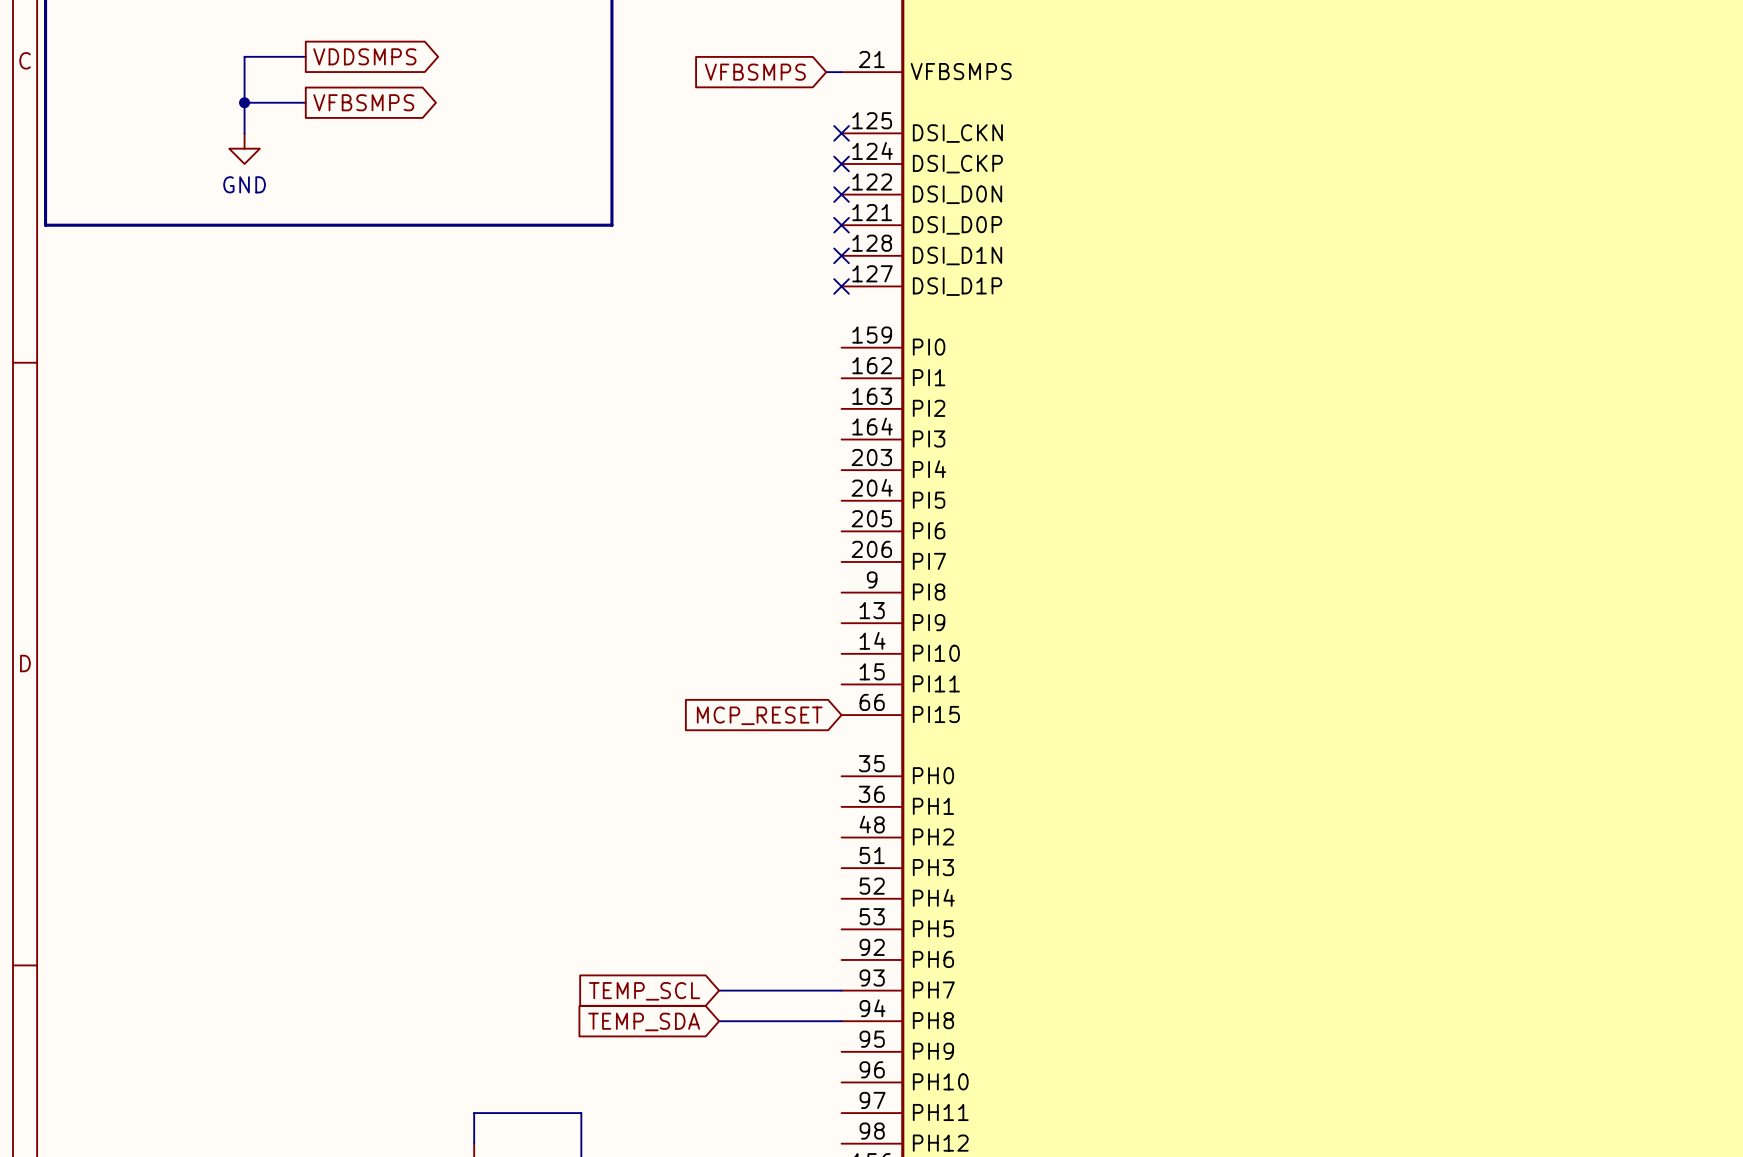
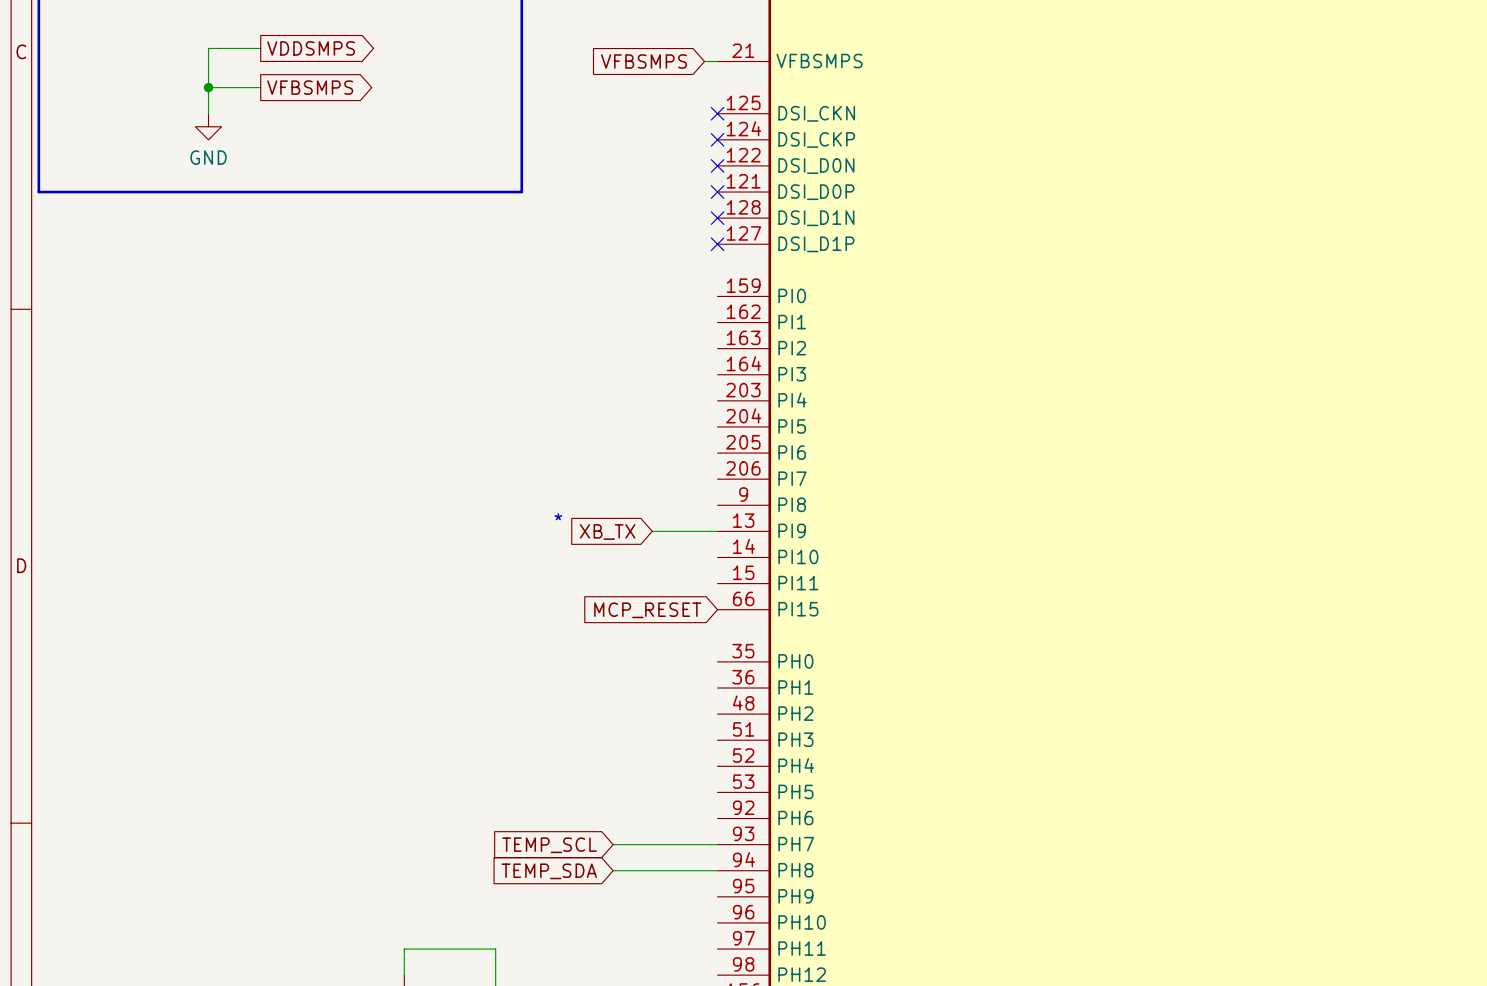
text: none -> * (558, 516)
global label: none -> XB_TX (607, 532)
wire: none -> (652, 531) (717, 531)

